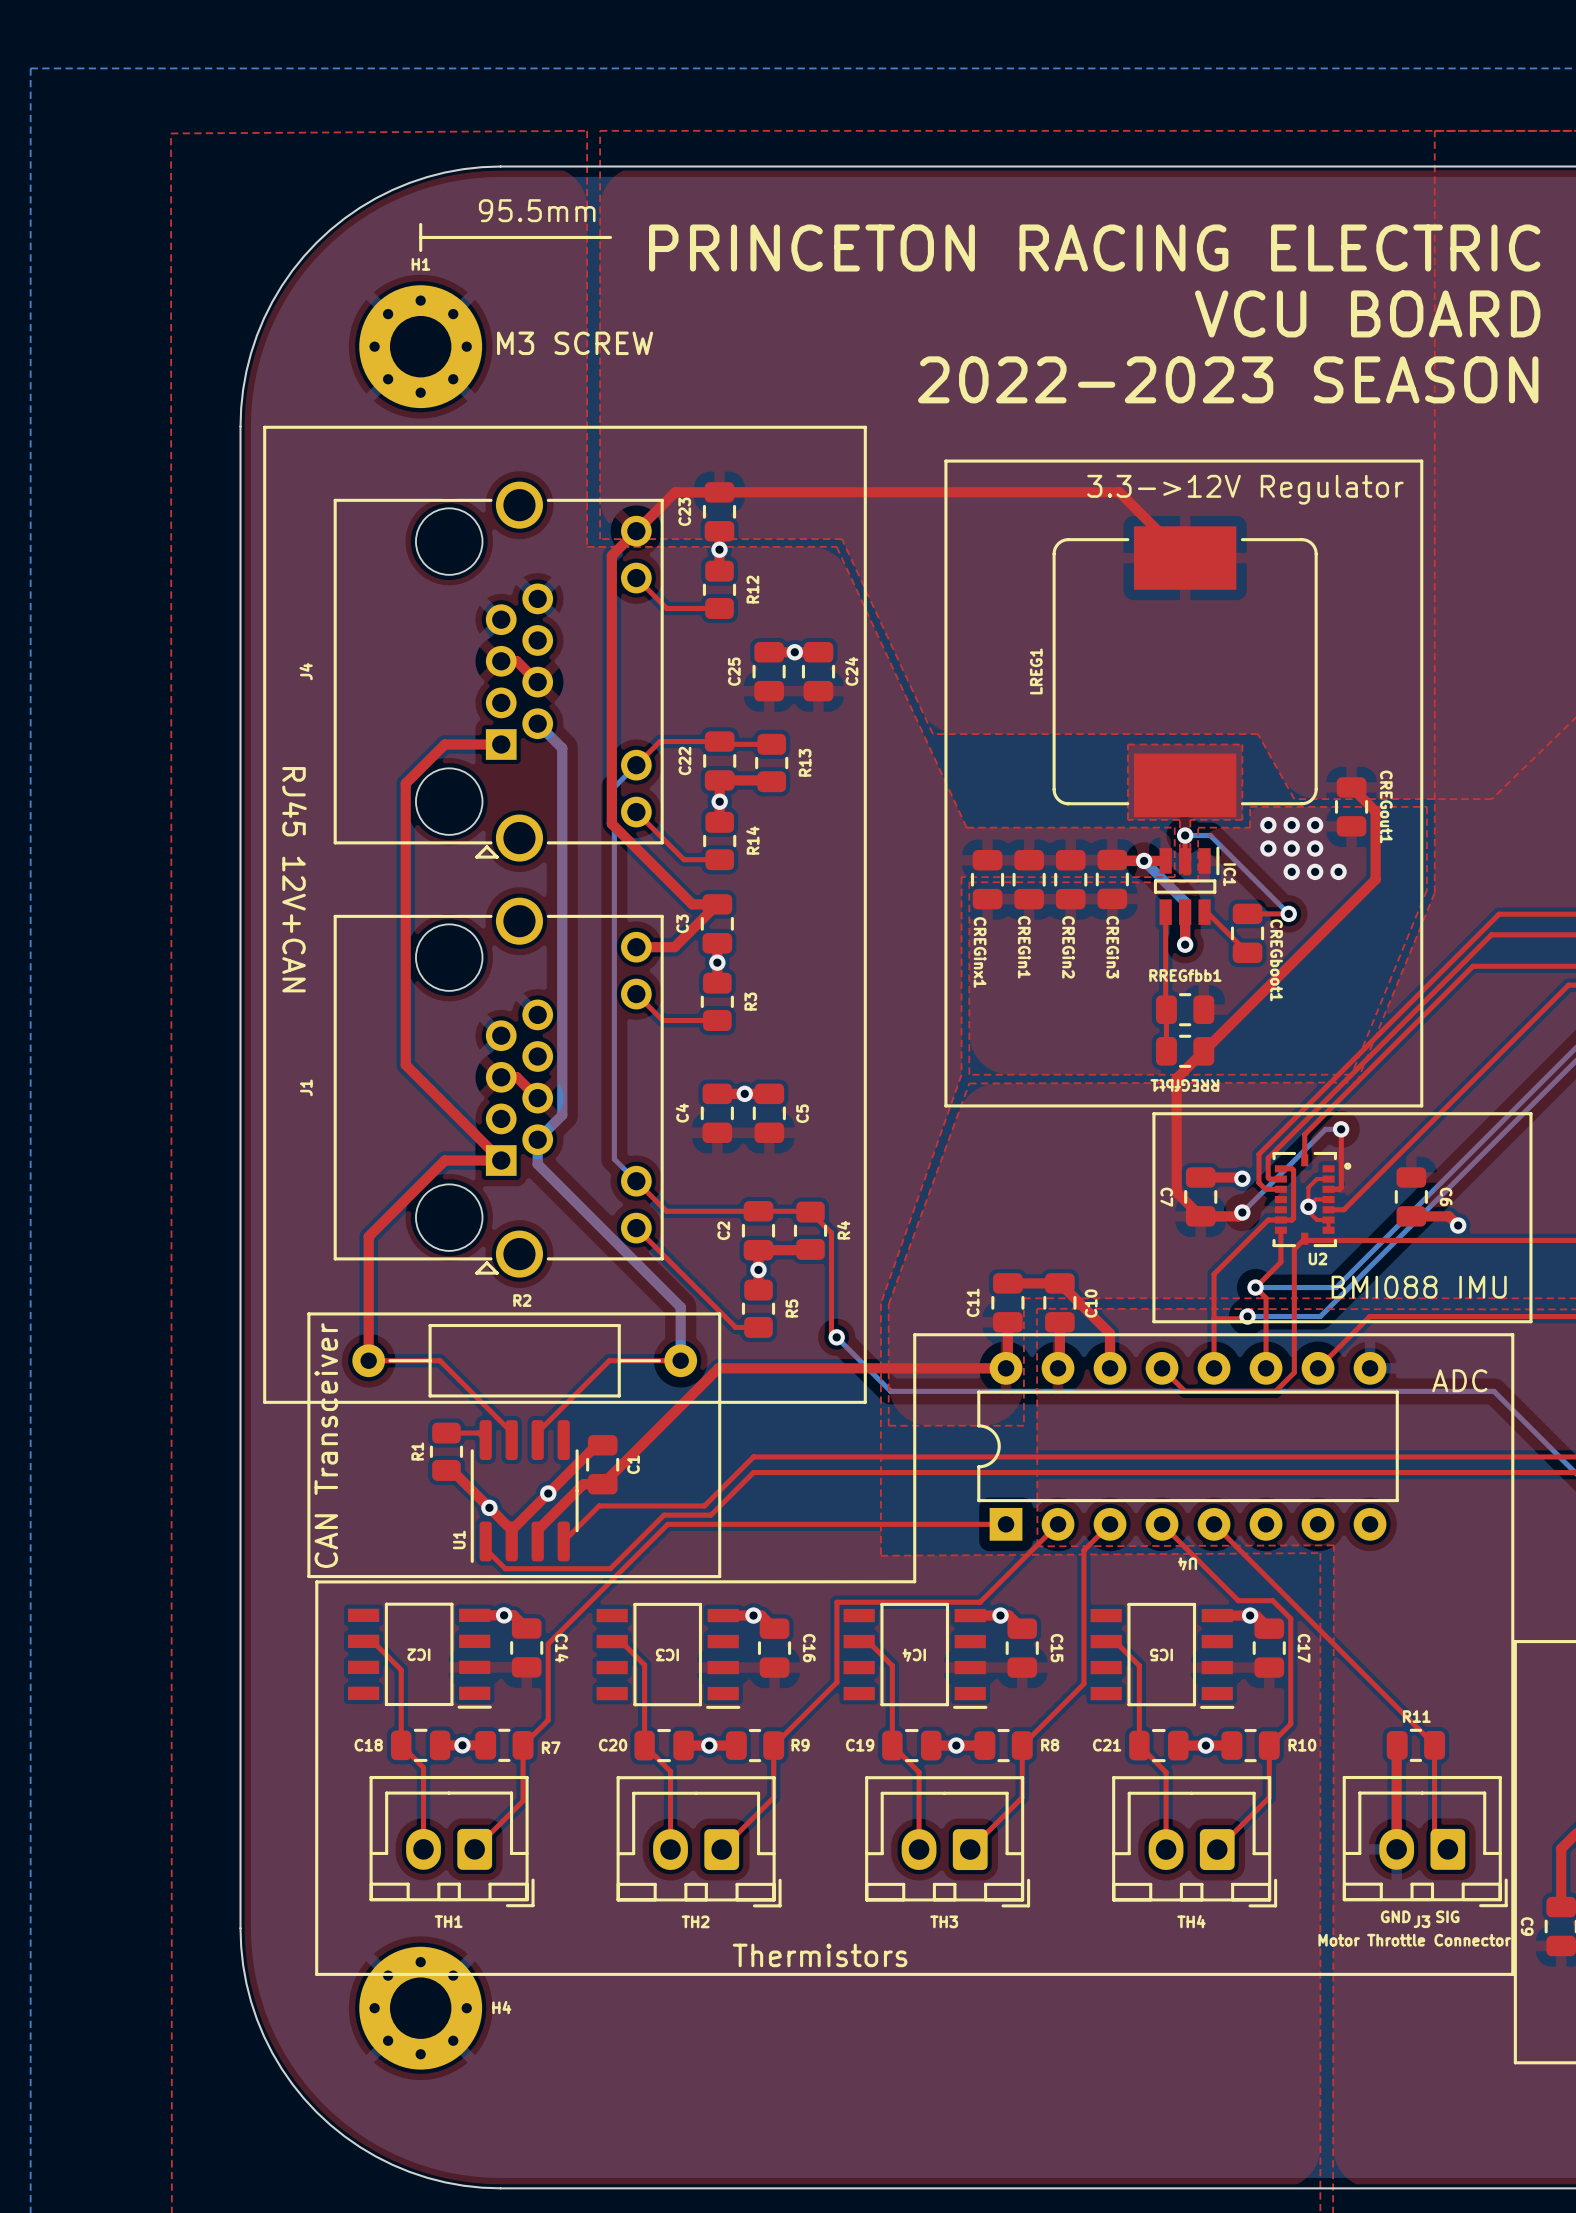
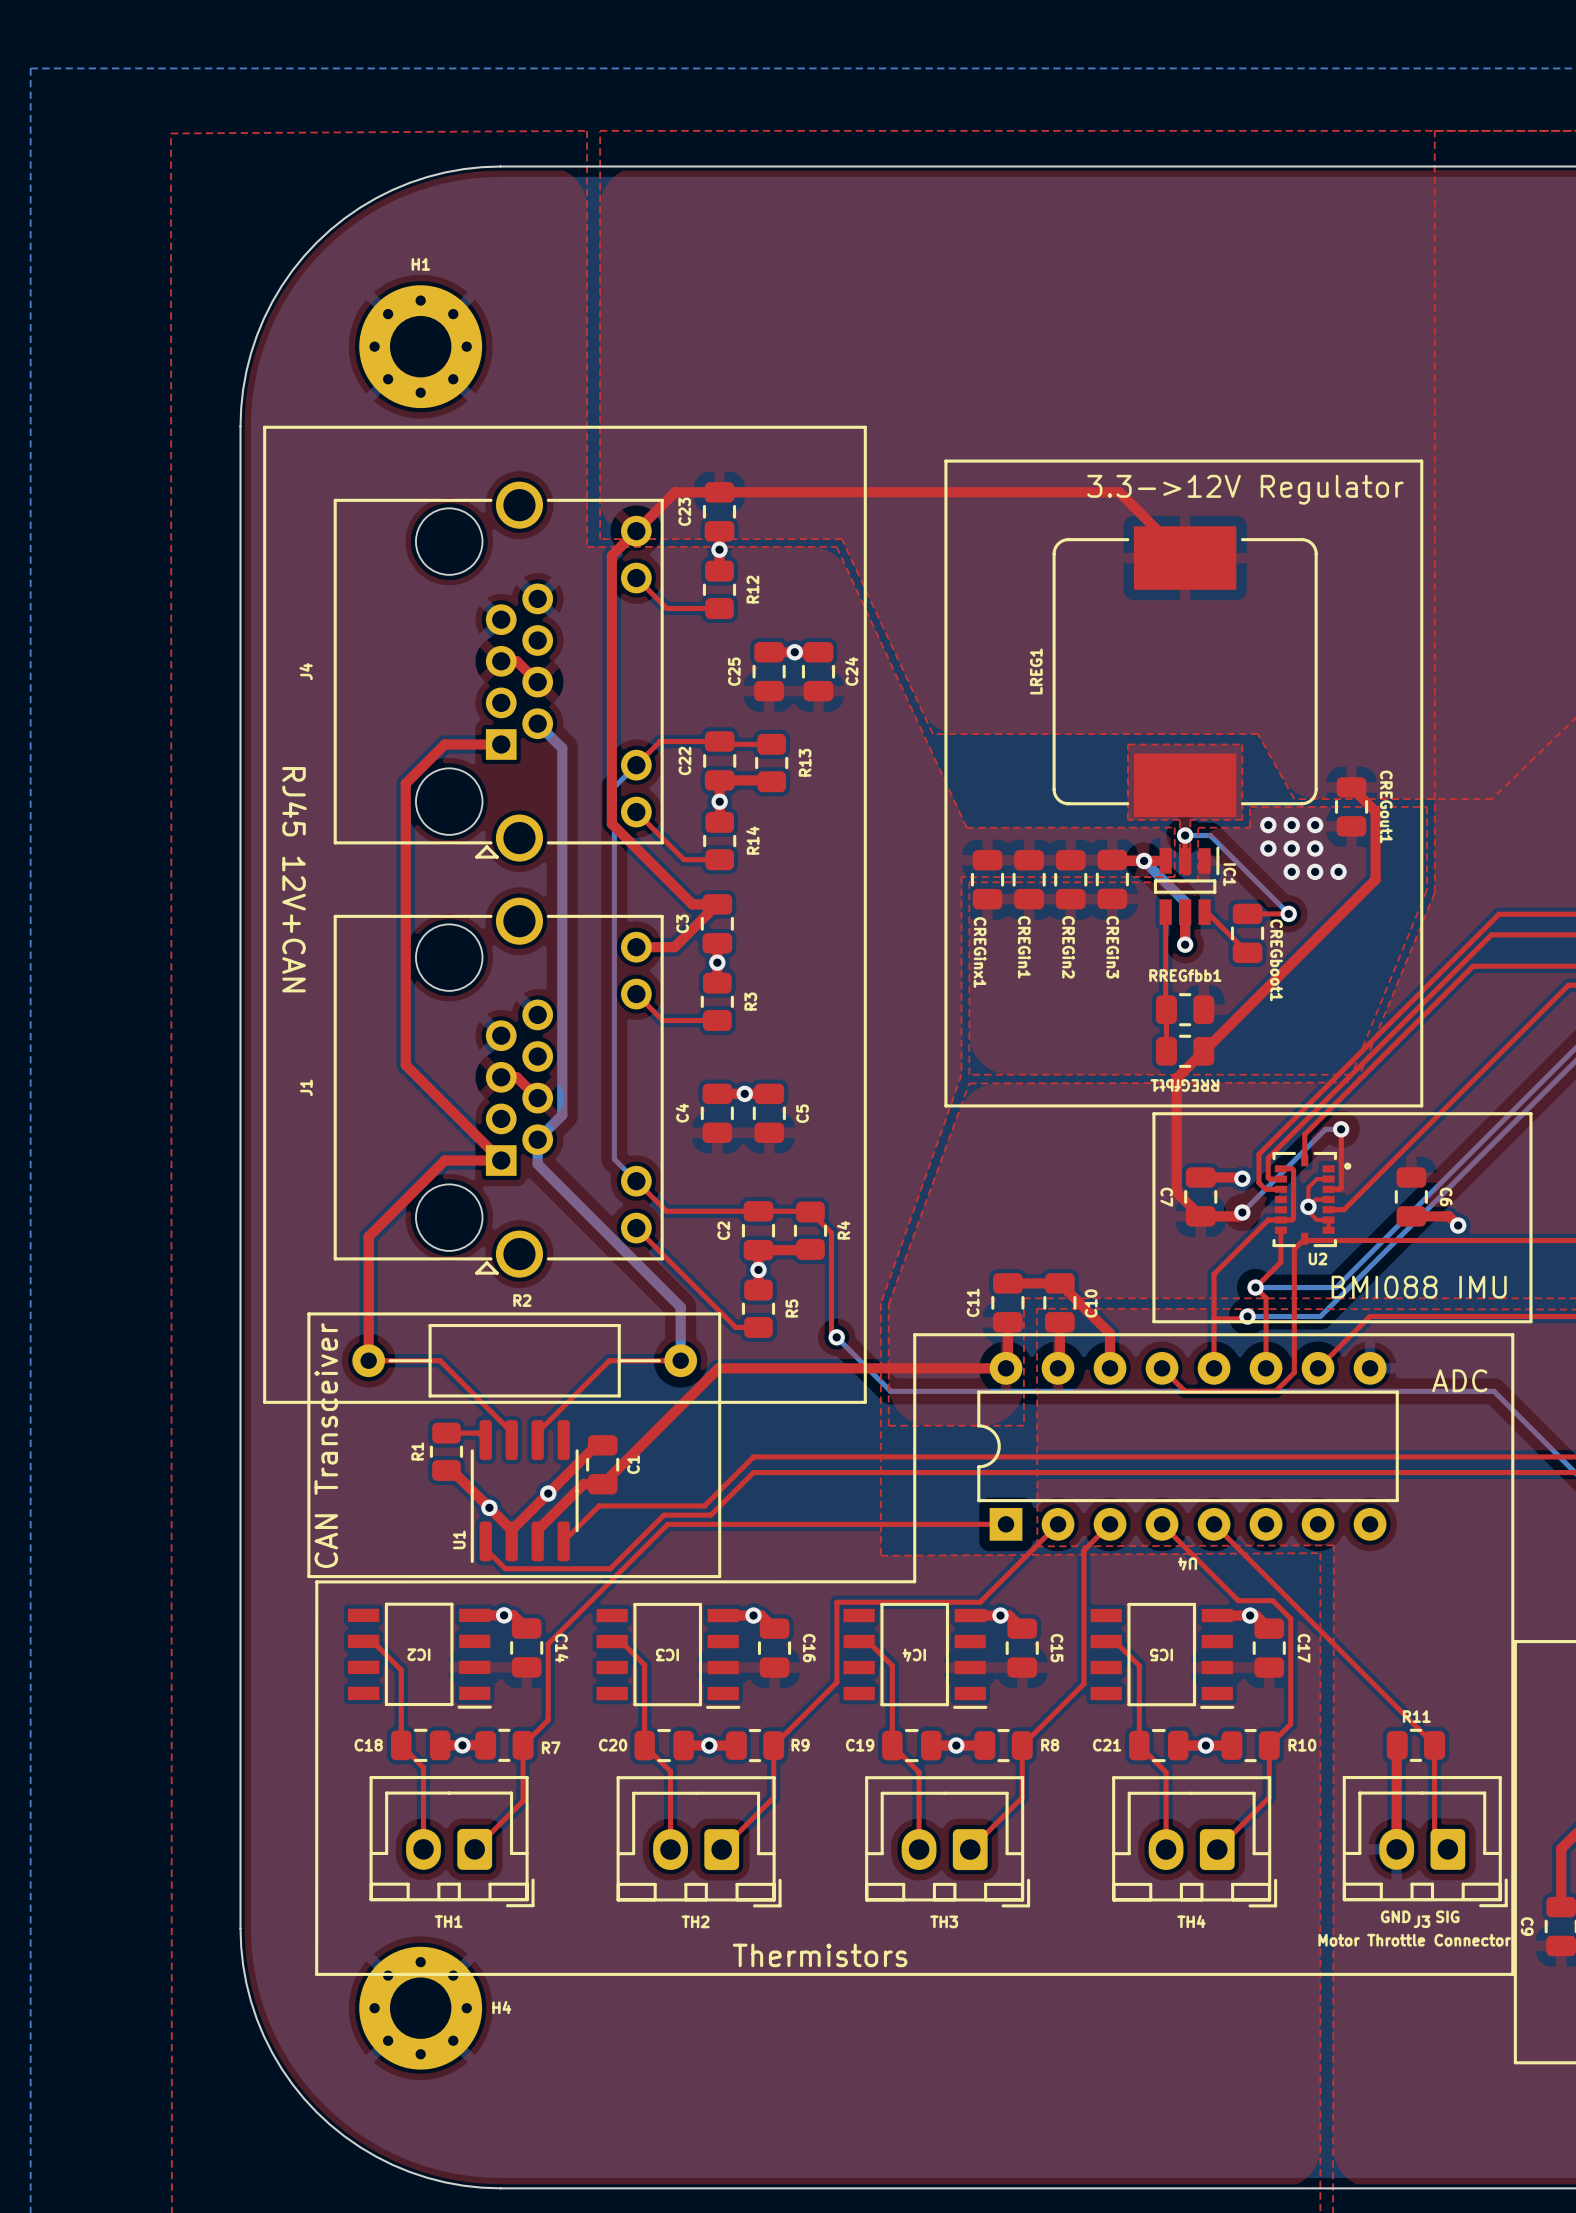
text: 95.5mm (537, 210) -> none
line: (420, 224) (420, 250) -> none
line: (420, 237) (610, 237) -> none
text: PRINCETON RACING ELECTRIC (1094, 248) -> none
text: VCU BOARD (1367, 313) -> none
text: M3 SCREW (575, 343) -> none
text: 2022-2023 SEASON (1228, 379) -> none

